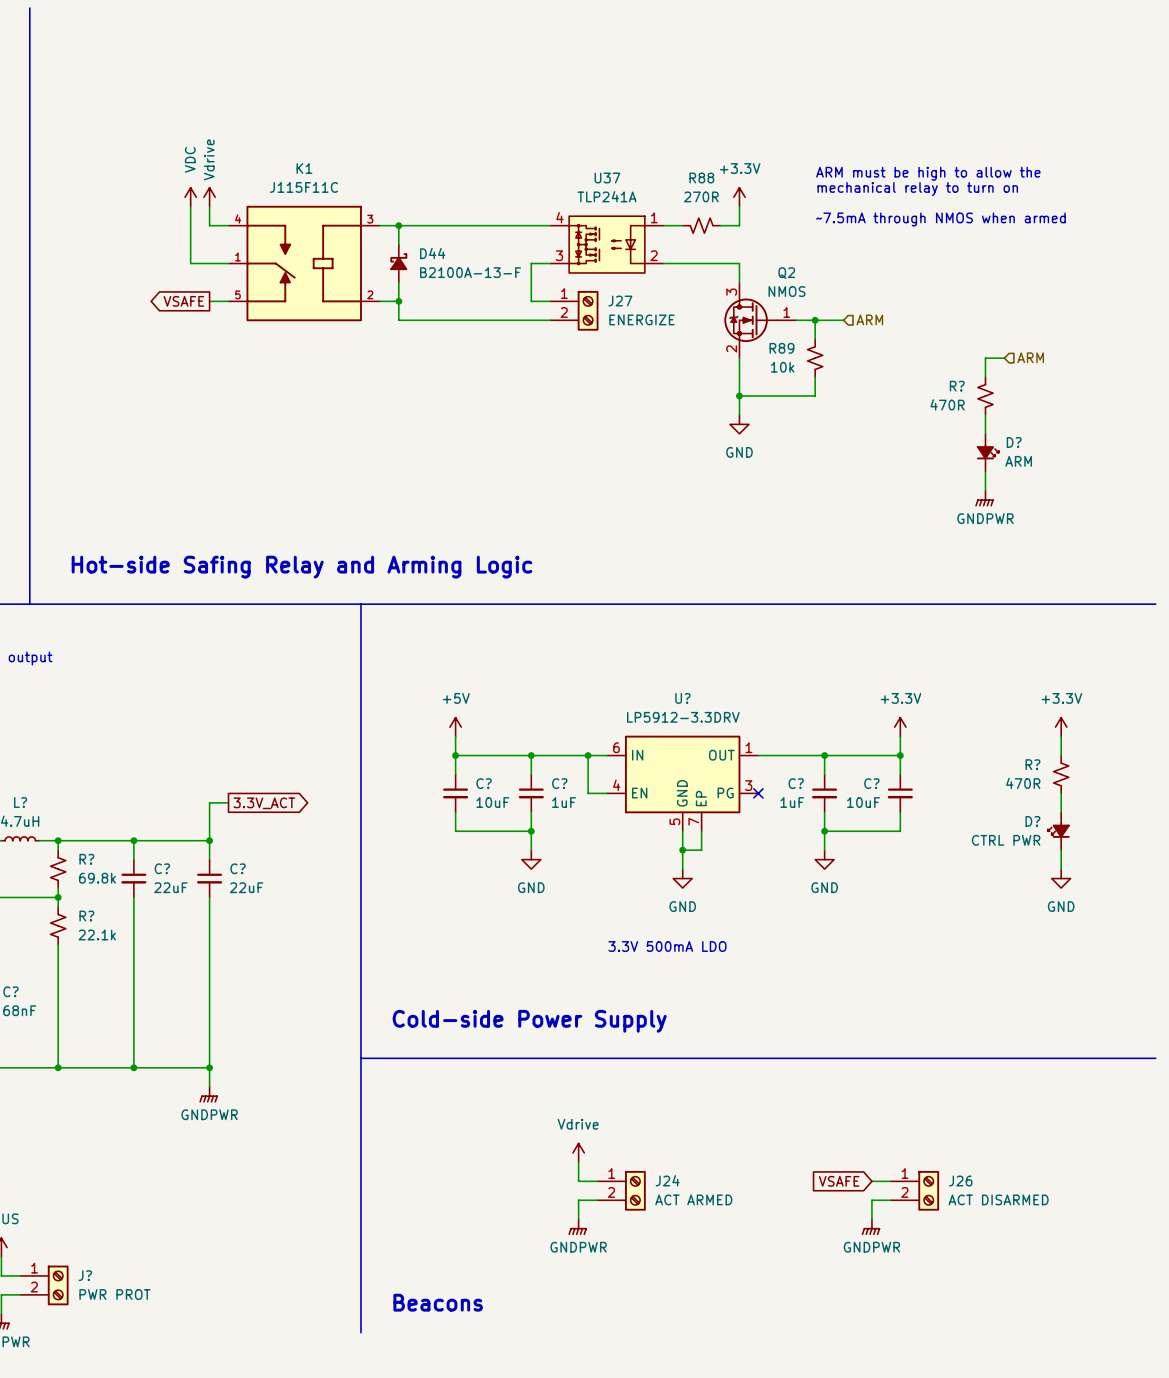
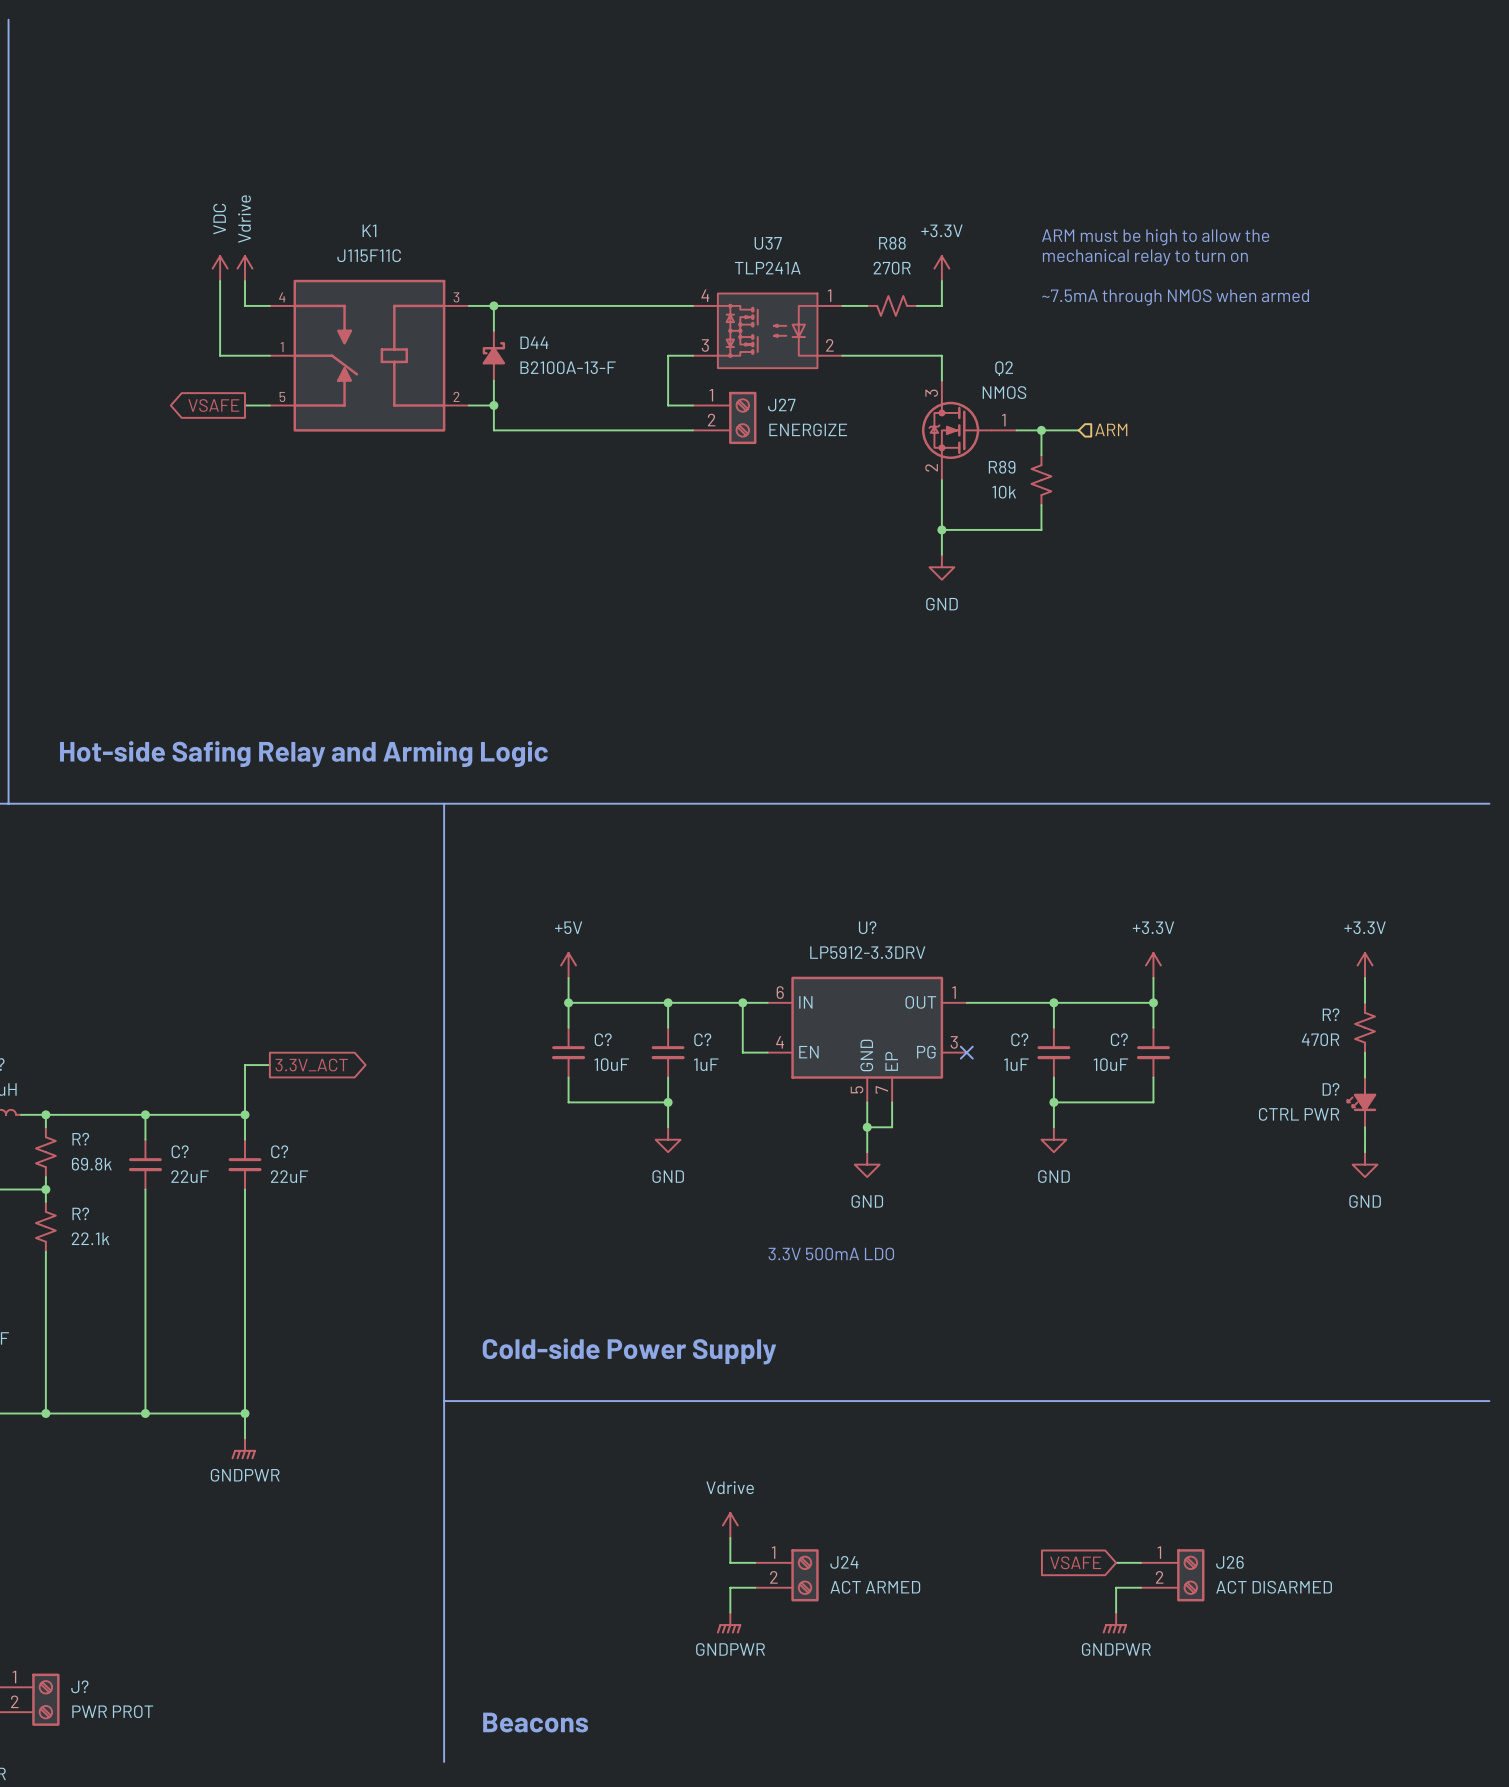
hierarchical label: ARM (1030, 357) -> none
wire: (1004, 358) (985, 358) (985, 377) -> none
R?: 470R (985, 395) -> none
wire: (985, 414) (985, 433) -> none
D?: ARM (987, 452) -> none
wire: (985, 471) (985, 490) -> none
power symbol: GNDPWR (984, 498) -> none

